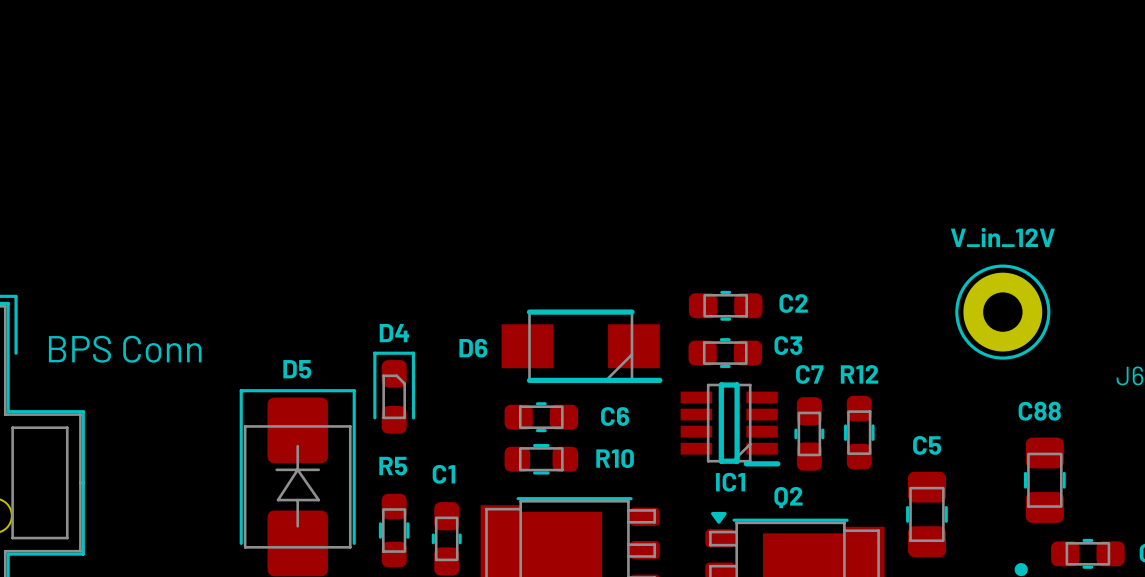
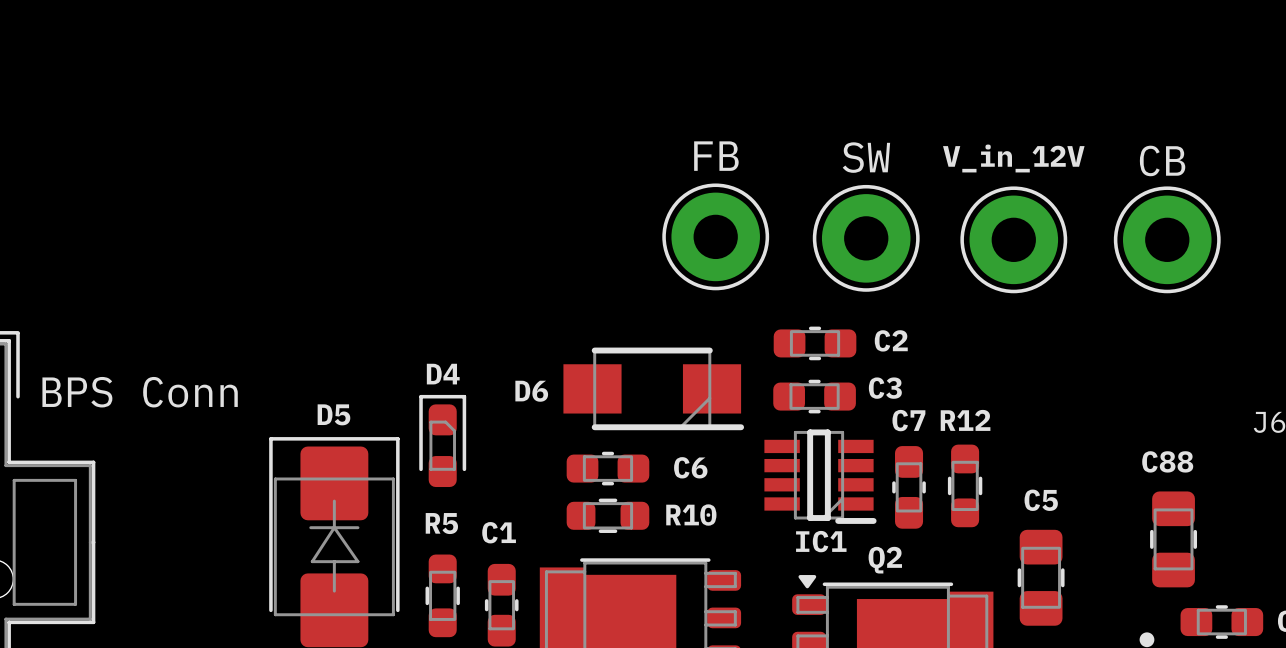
part: none -> FB (715, 236)
part: none -> SW (866, 238)
part: none -> CB (1167, 239)
part position: (1002, 312) -> (1013, 239)

